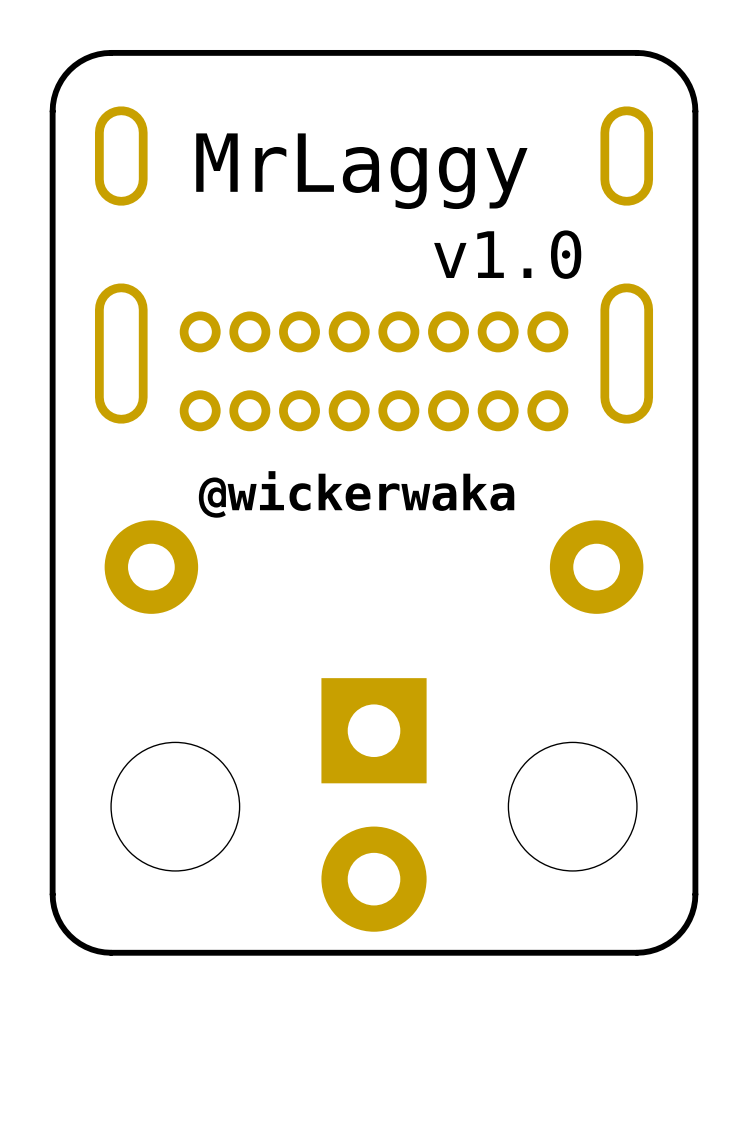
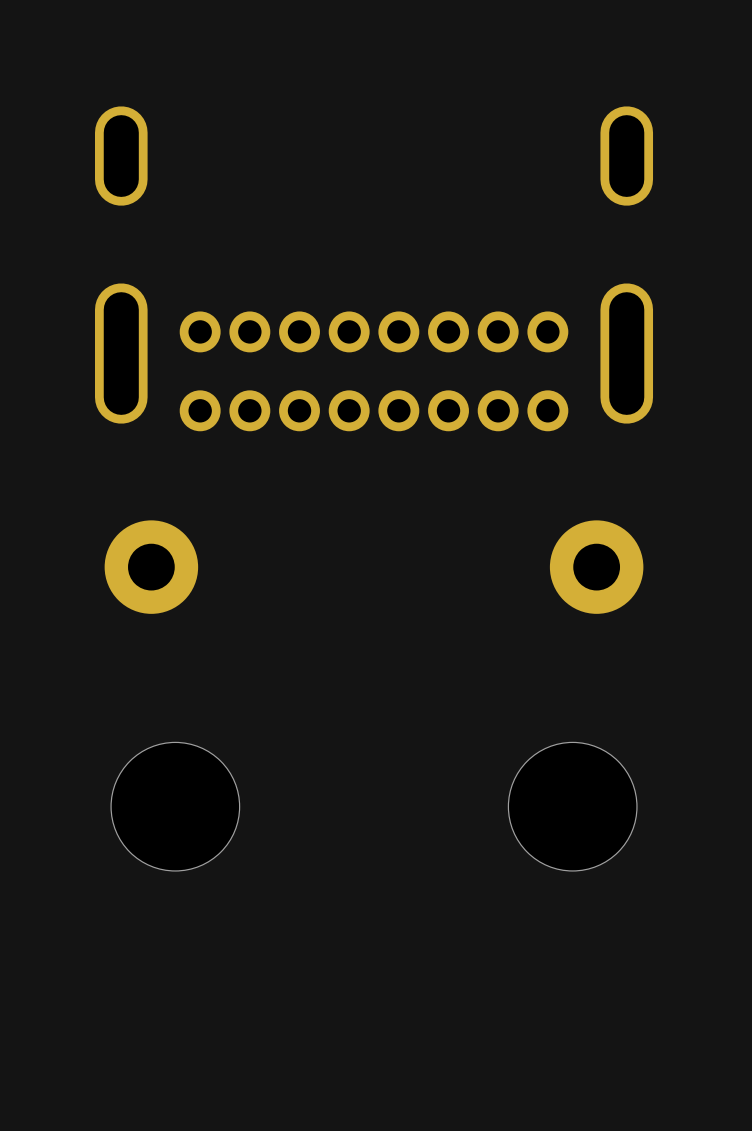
board edge: (636, 52) (111, 52) (85, 58) (69, 70) (61, 80) (55, 92) (52, 111) (52, 894) (55, 913) (61, 925) (79, 943) (98, 951) (111, 952) (636, 952) (649, 951) (668, 943) (686, 925) (693, 907) (695, 894) (695, 104) (686, 80) (673, 65) (656, 56) (636, 52) -> none
text: MrLaggy (361, 171) -> none
text: v1.0 (507, 254) -> none
text: @wickerwaka (356, 494) -> none
part: (374, 804) -> none

